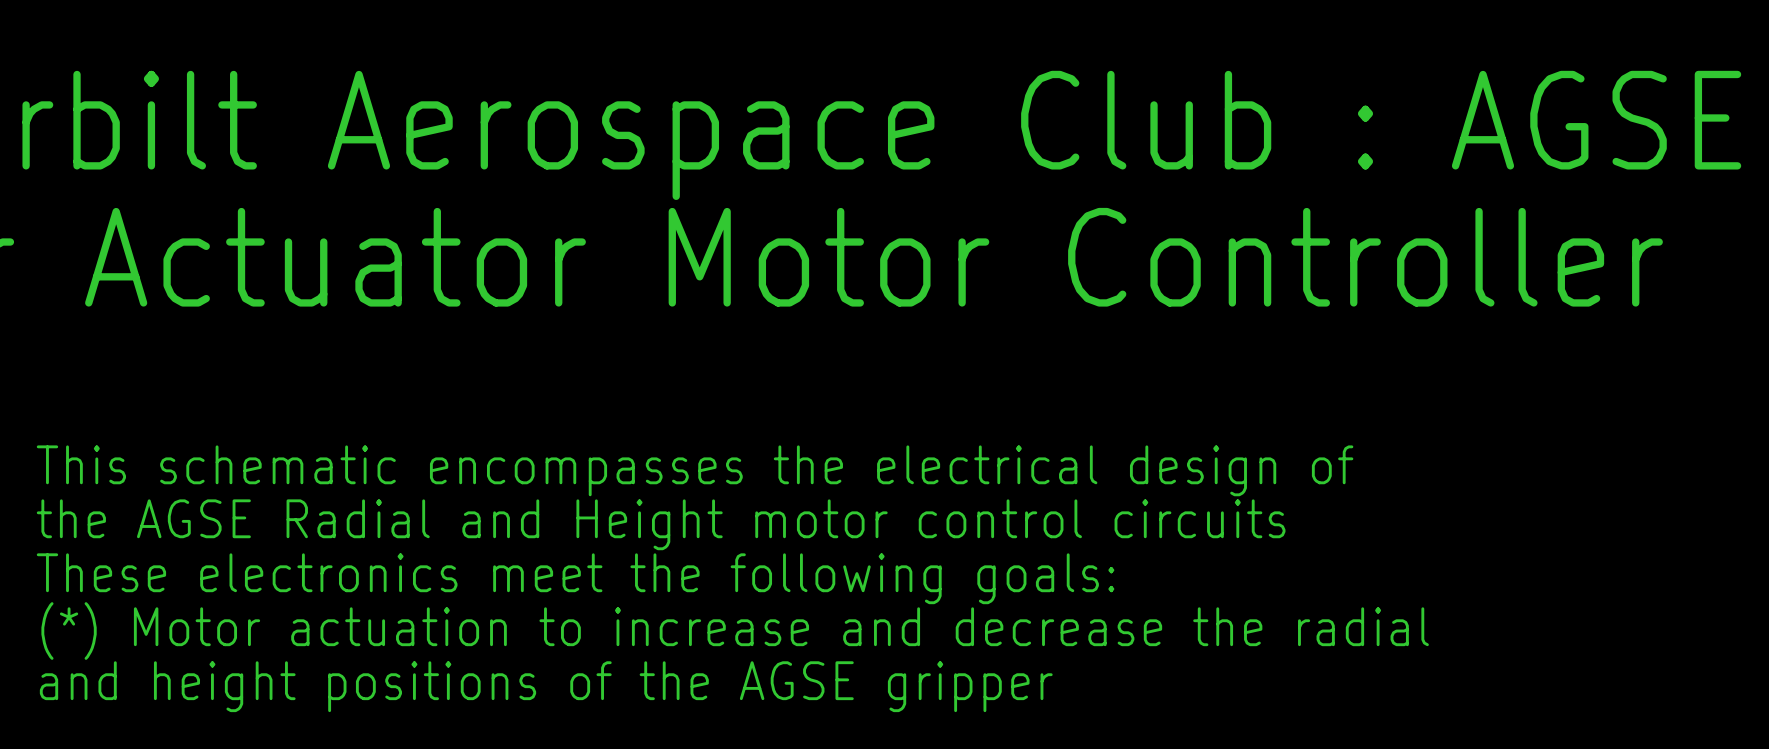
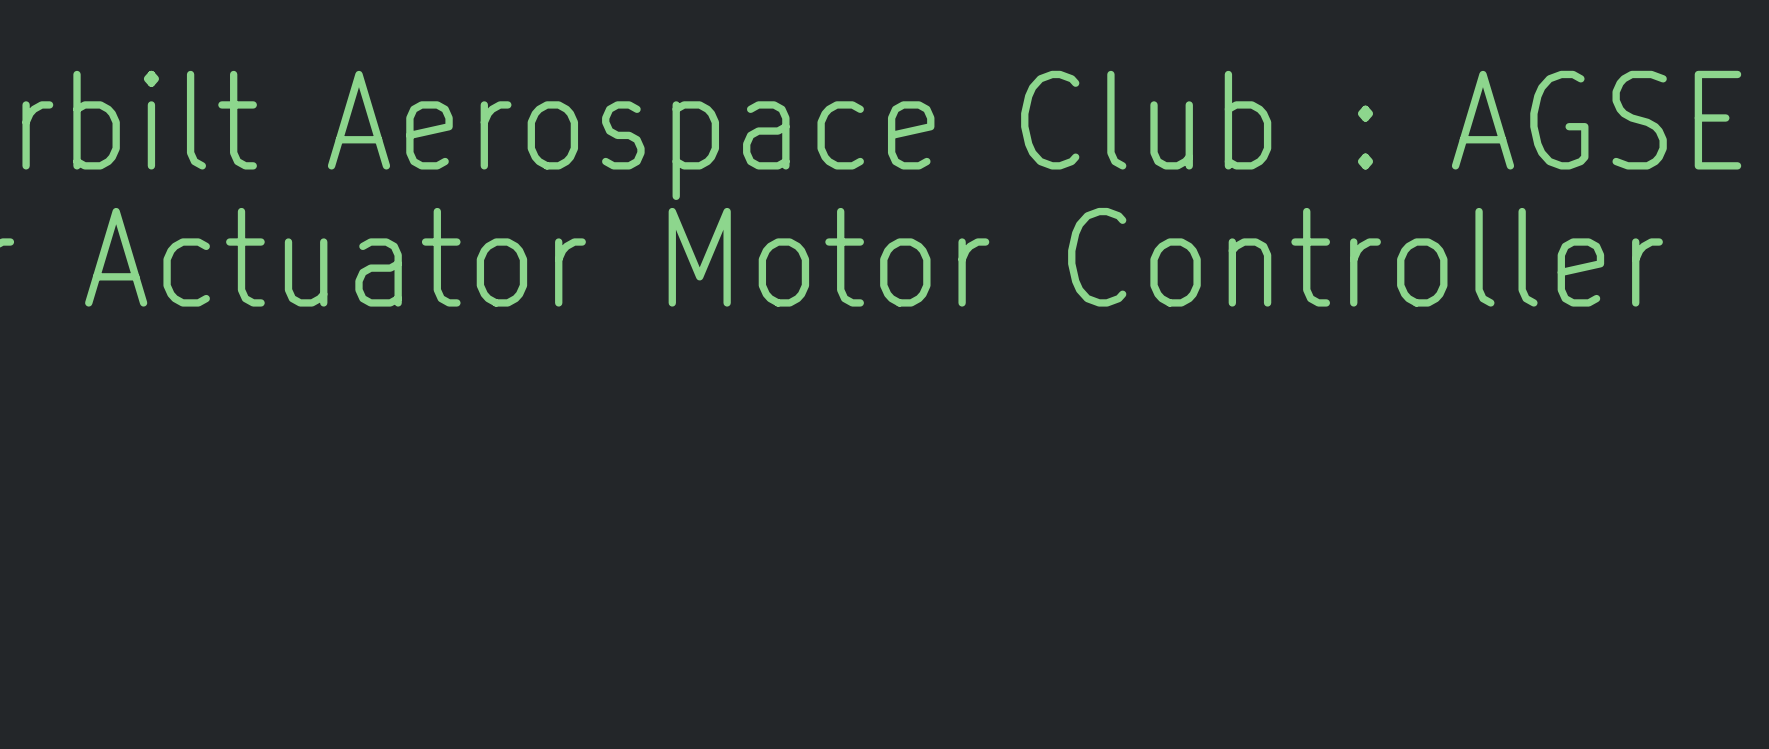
text: This schematic encompasses the electrical design of (695, 470) -> none
text: the AGSE Radial and Height motor control circuits (661, 524) -> none
text: These electronics meet the following goals: (575, 578) -> none
text: (*) Motor actuation to increase and decrease the radial (735, 631) -> none
text: and height positions of the AGSE gripper (546, 686) -> none

